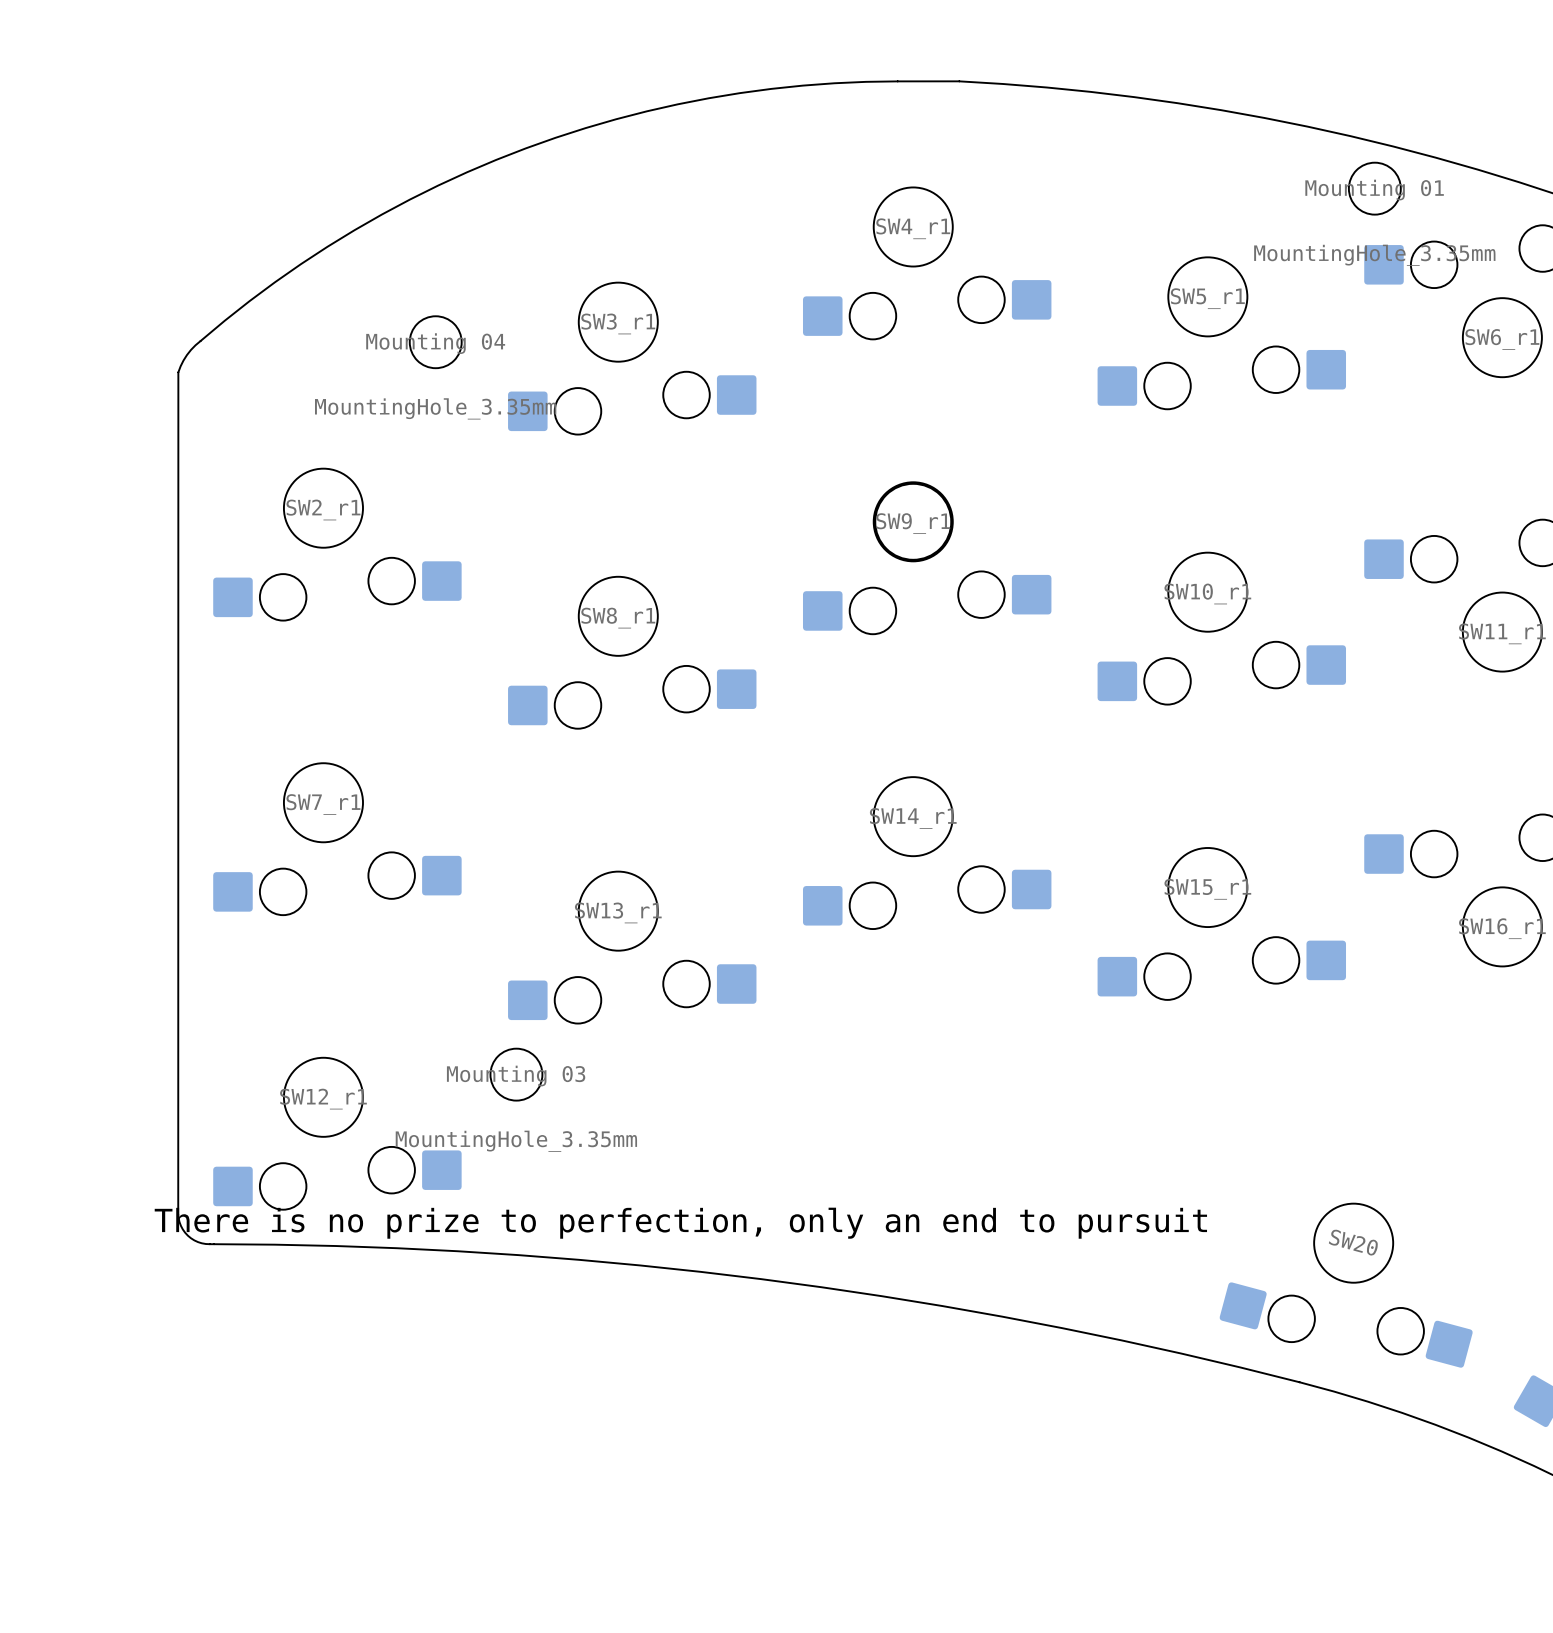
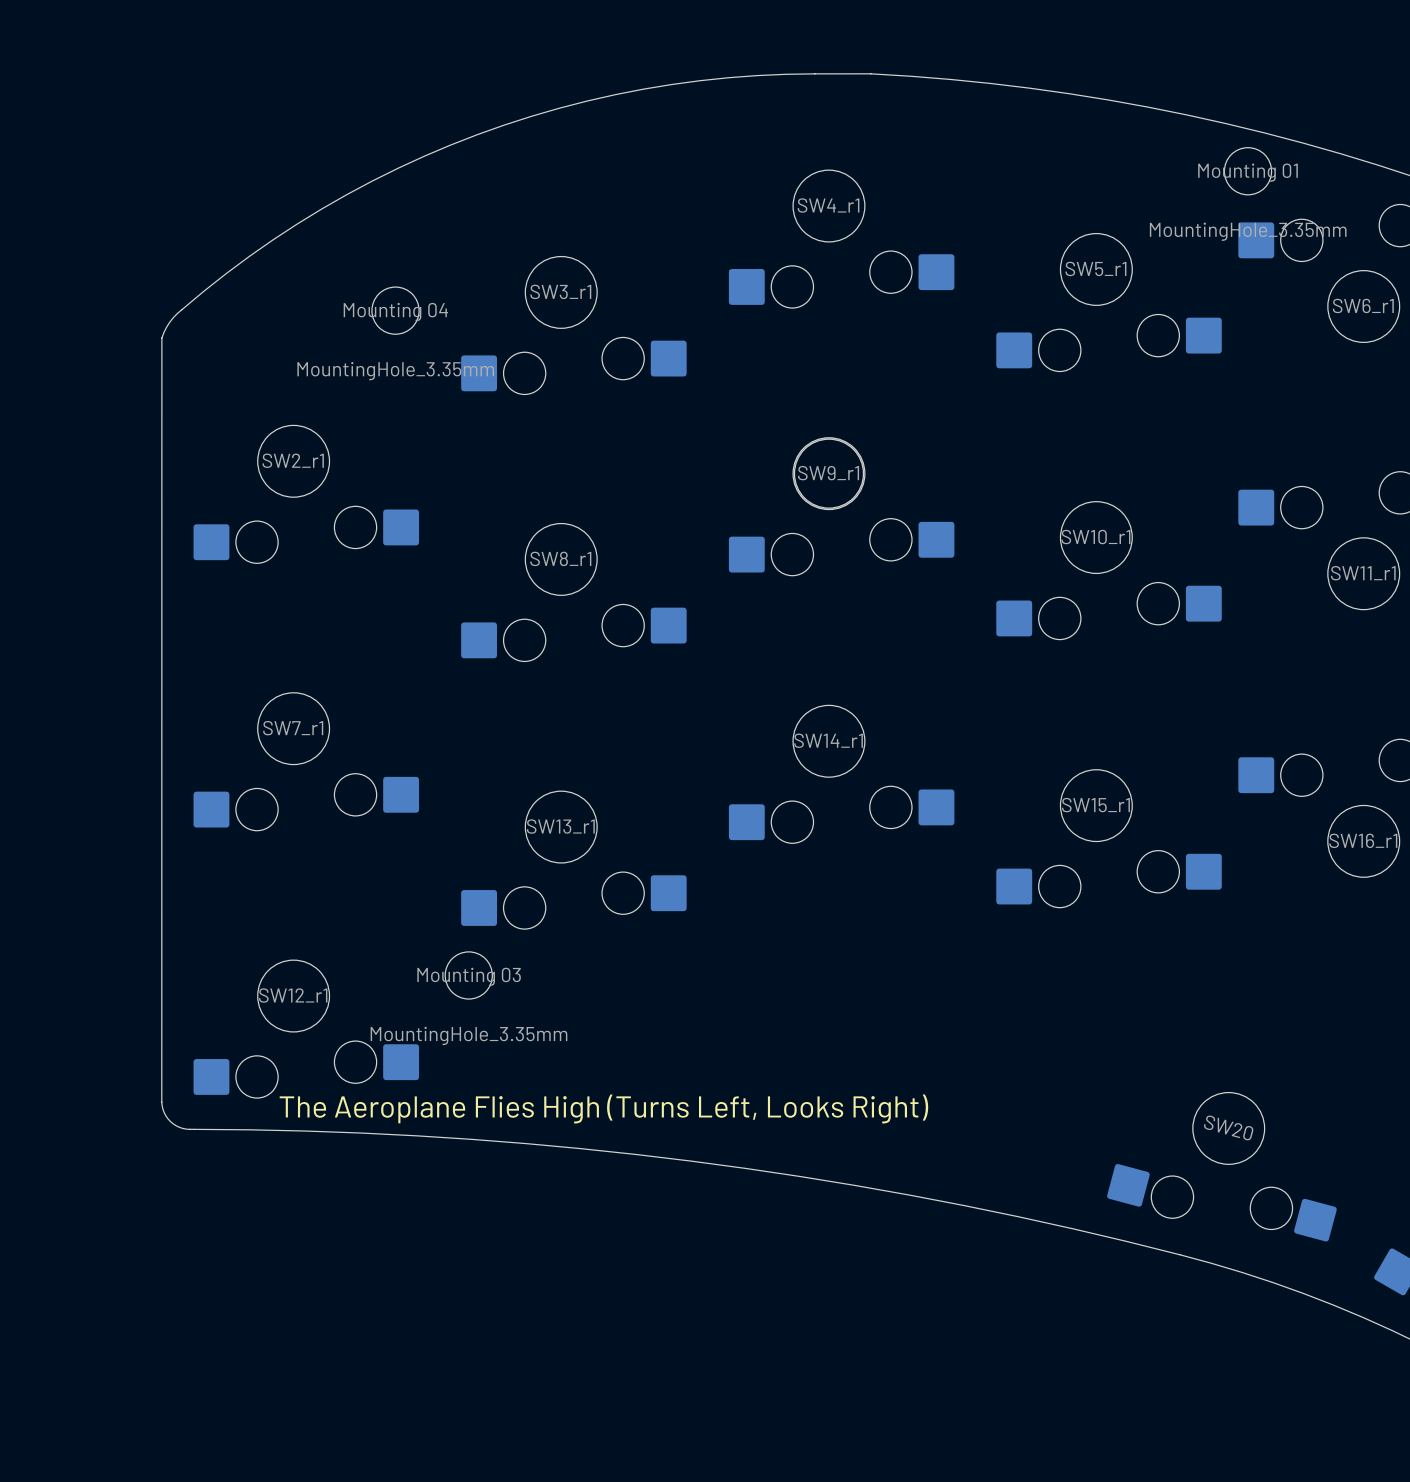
text: none -> The Aeroplane Flies High (Turns Left, Looks Right) (603, 1108)
text: There is no prize to perfection, only an end to pursuit (680, 1223) -> none

